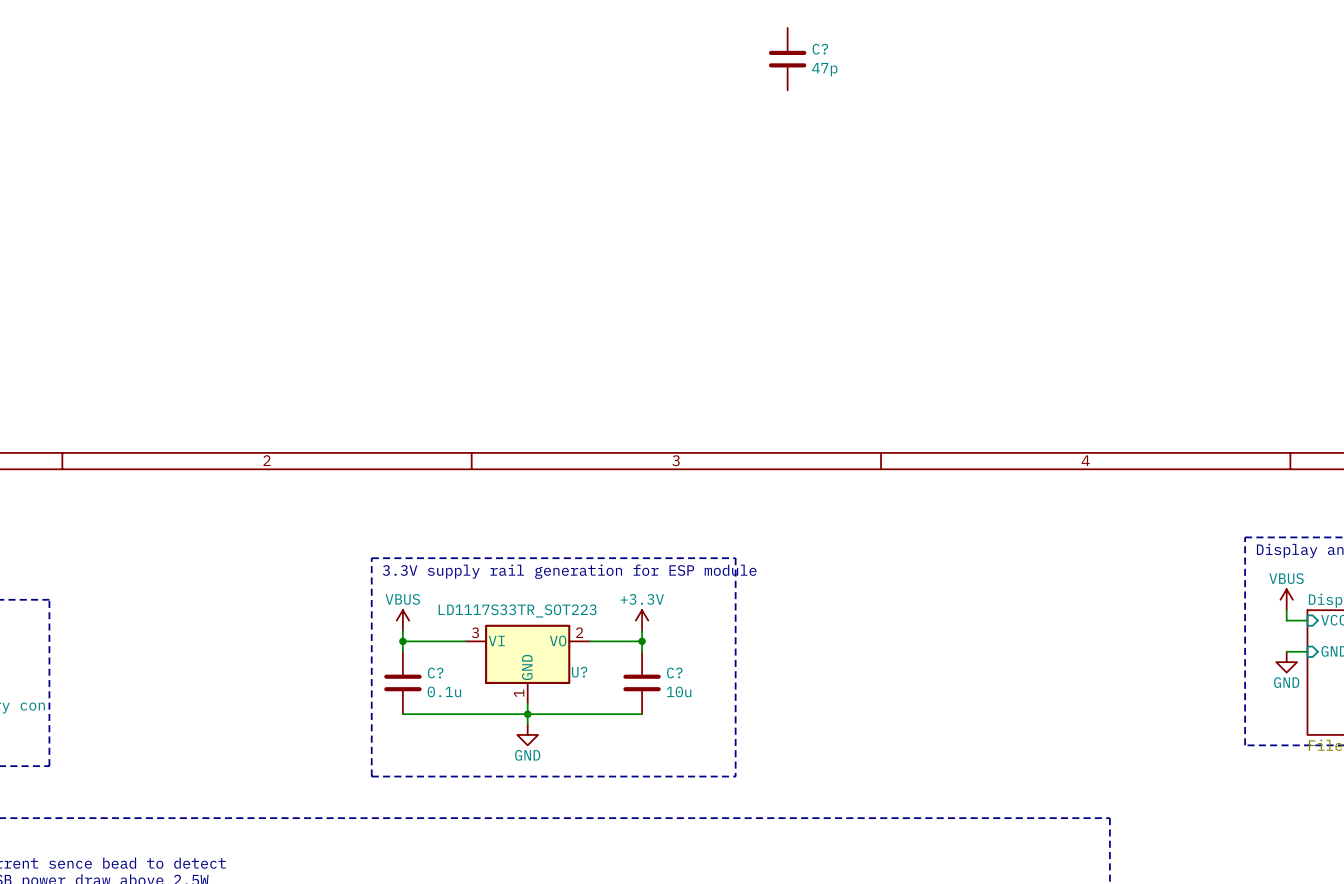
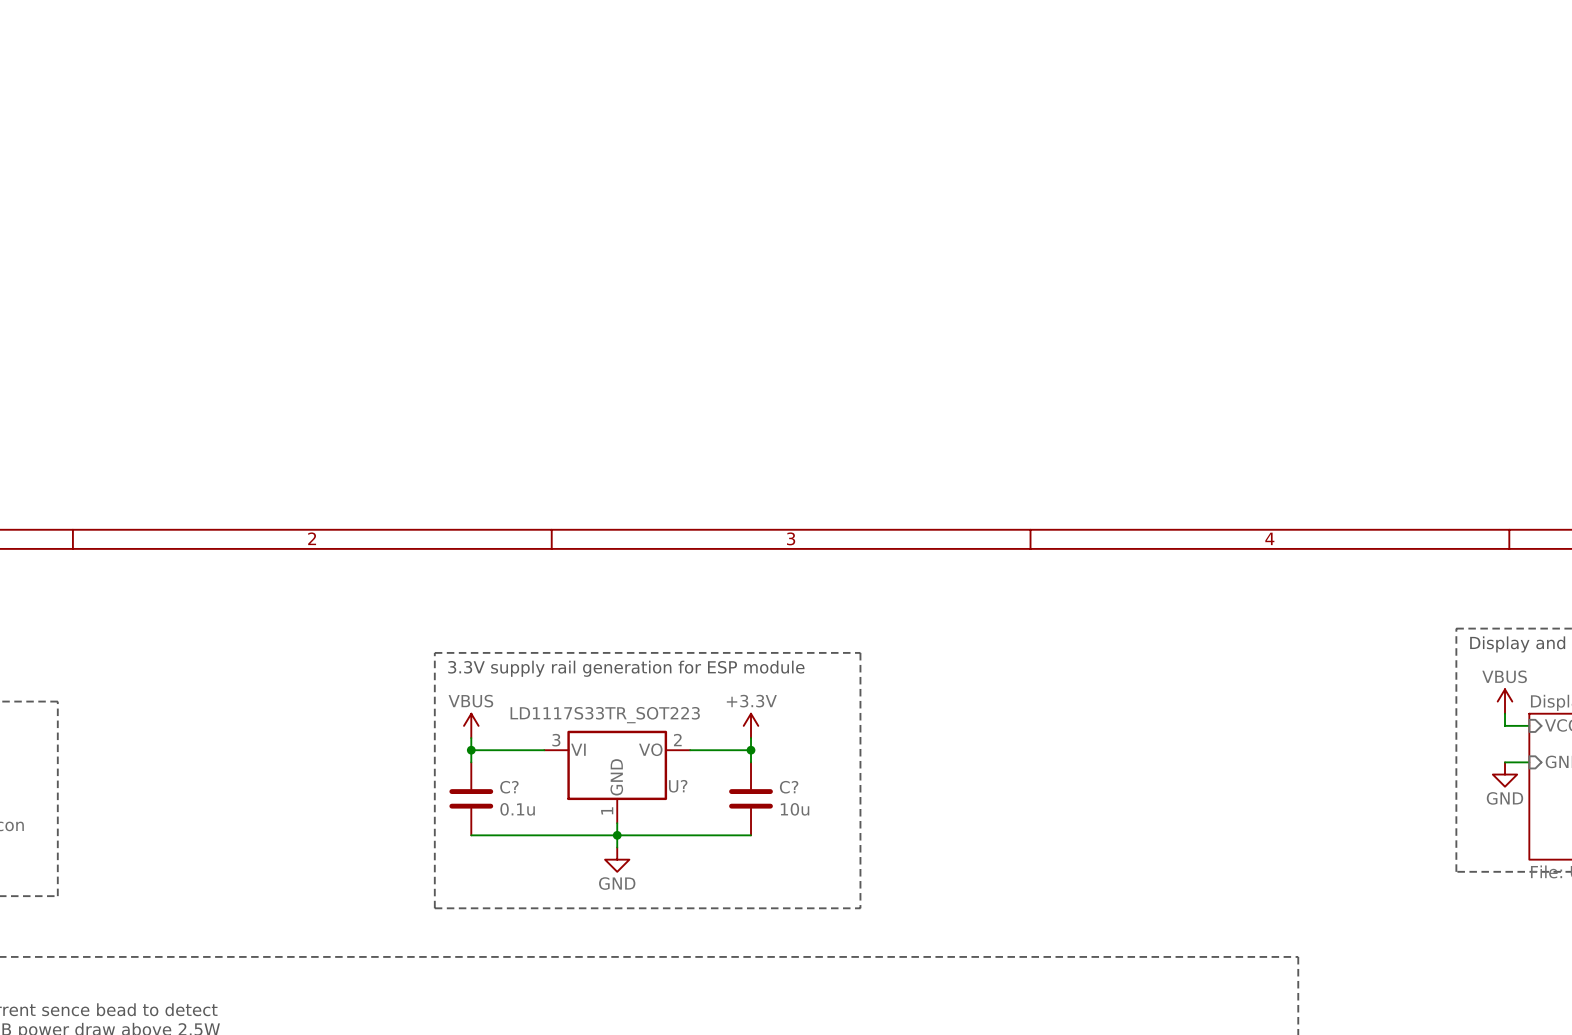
C?: 47p (787, 59) -> none

